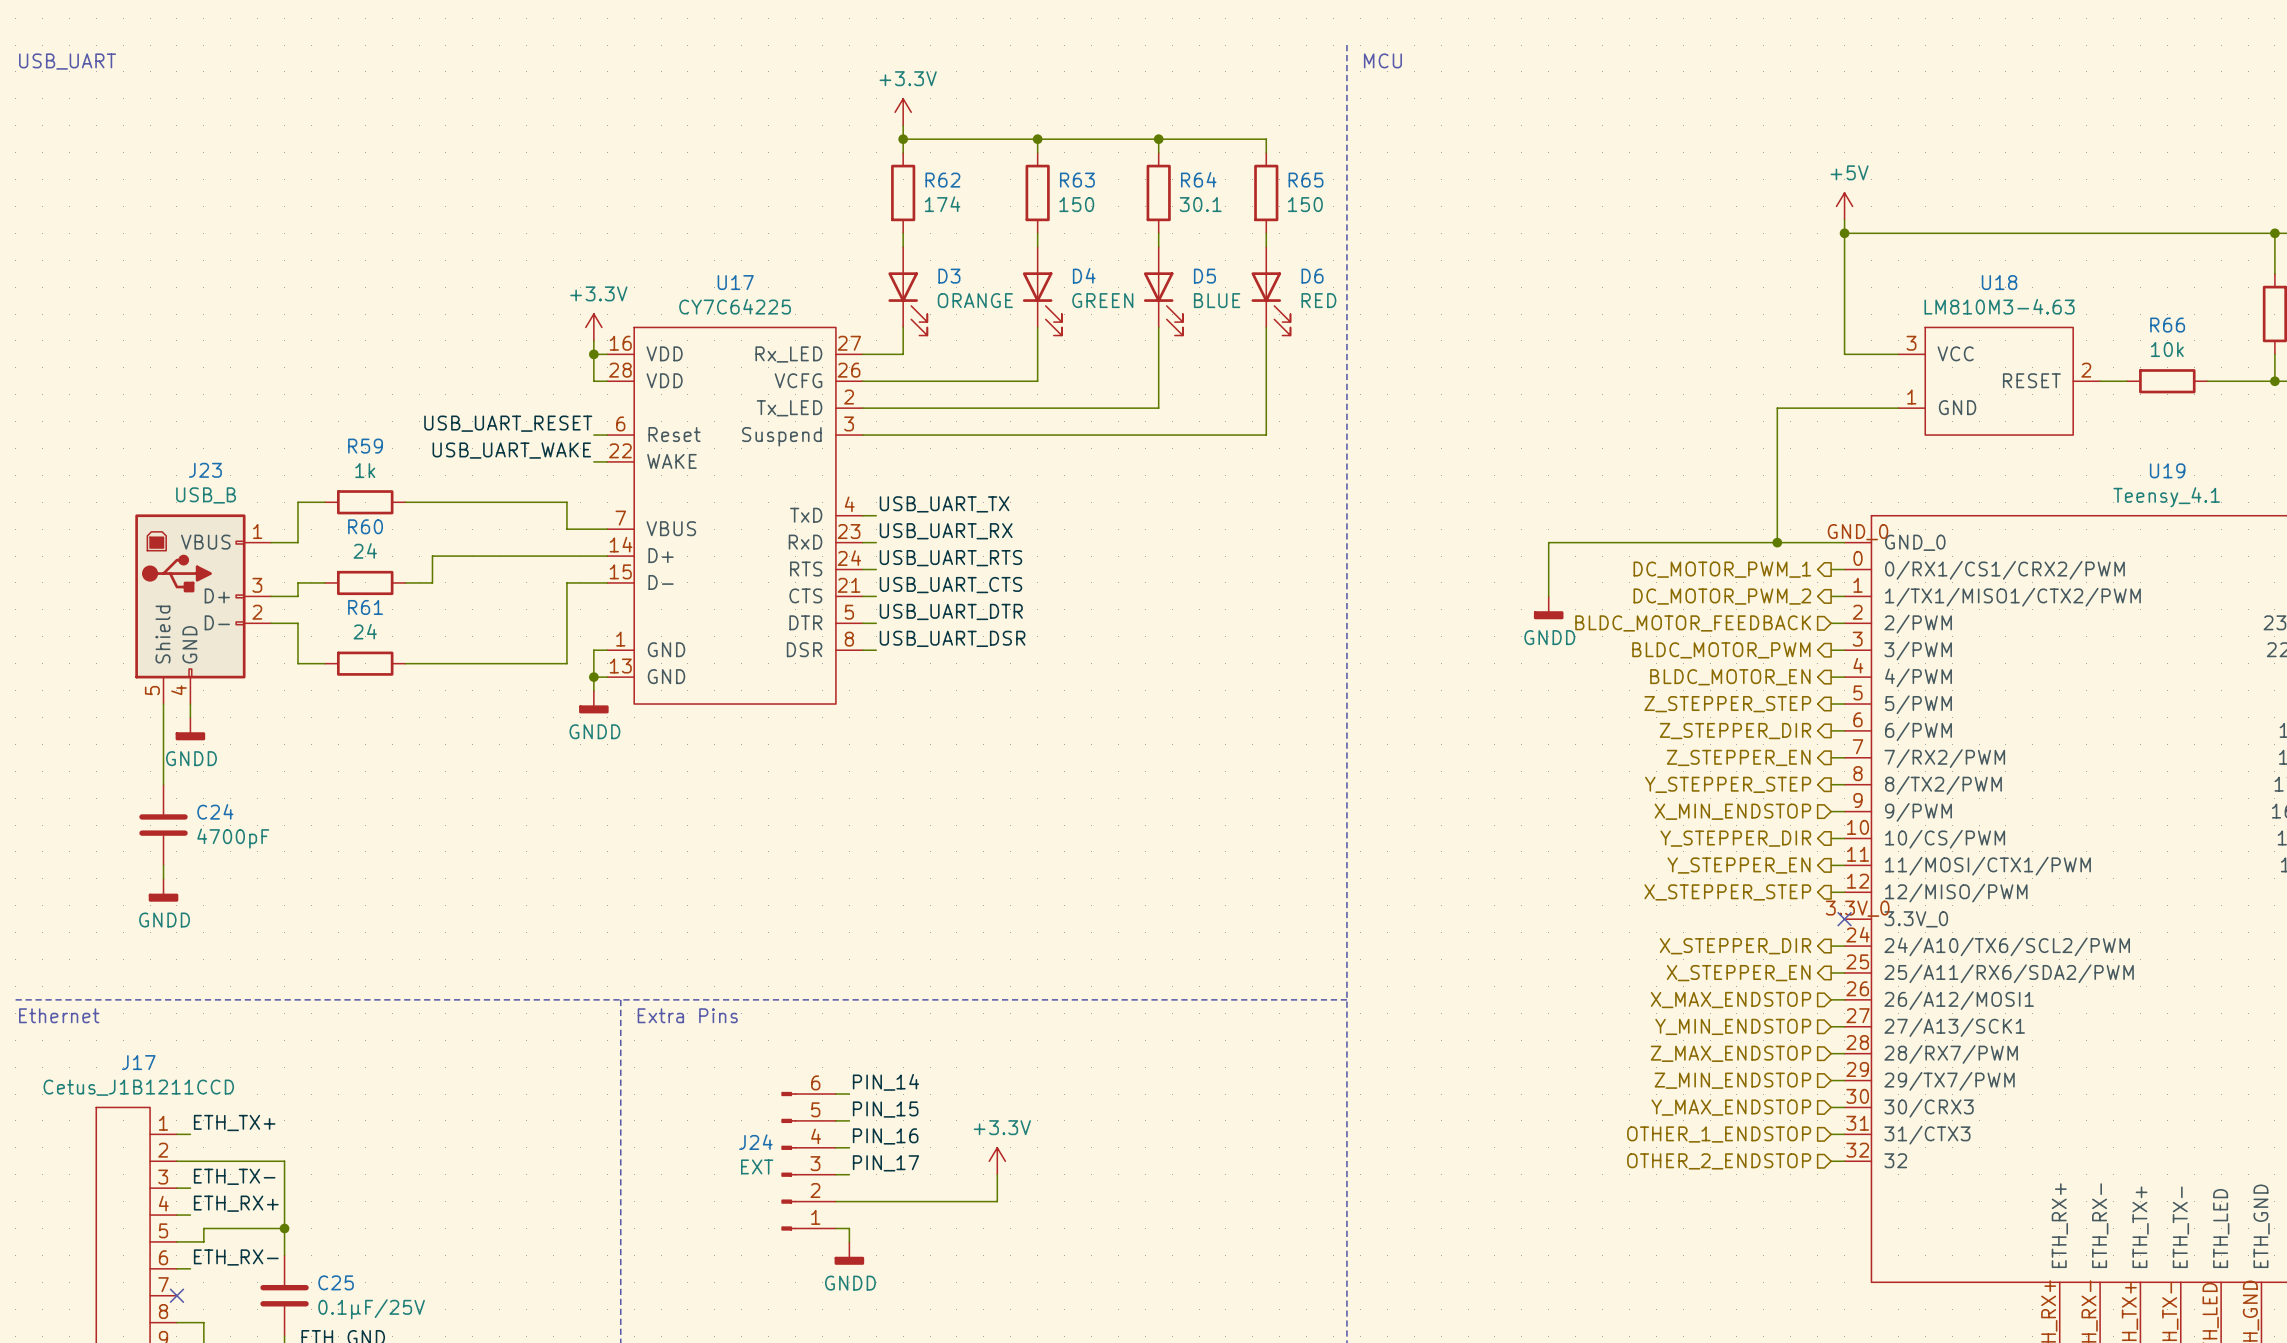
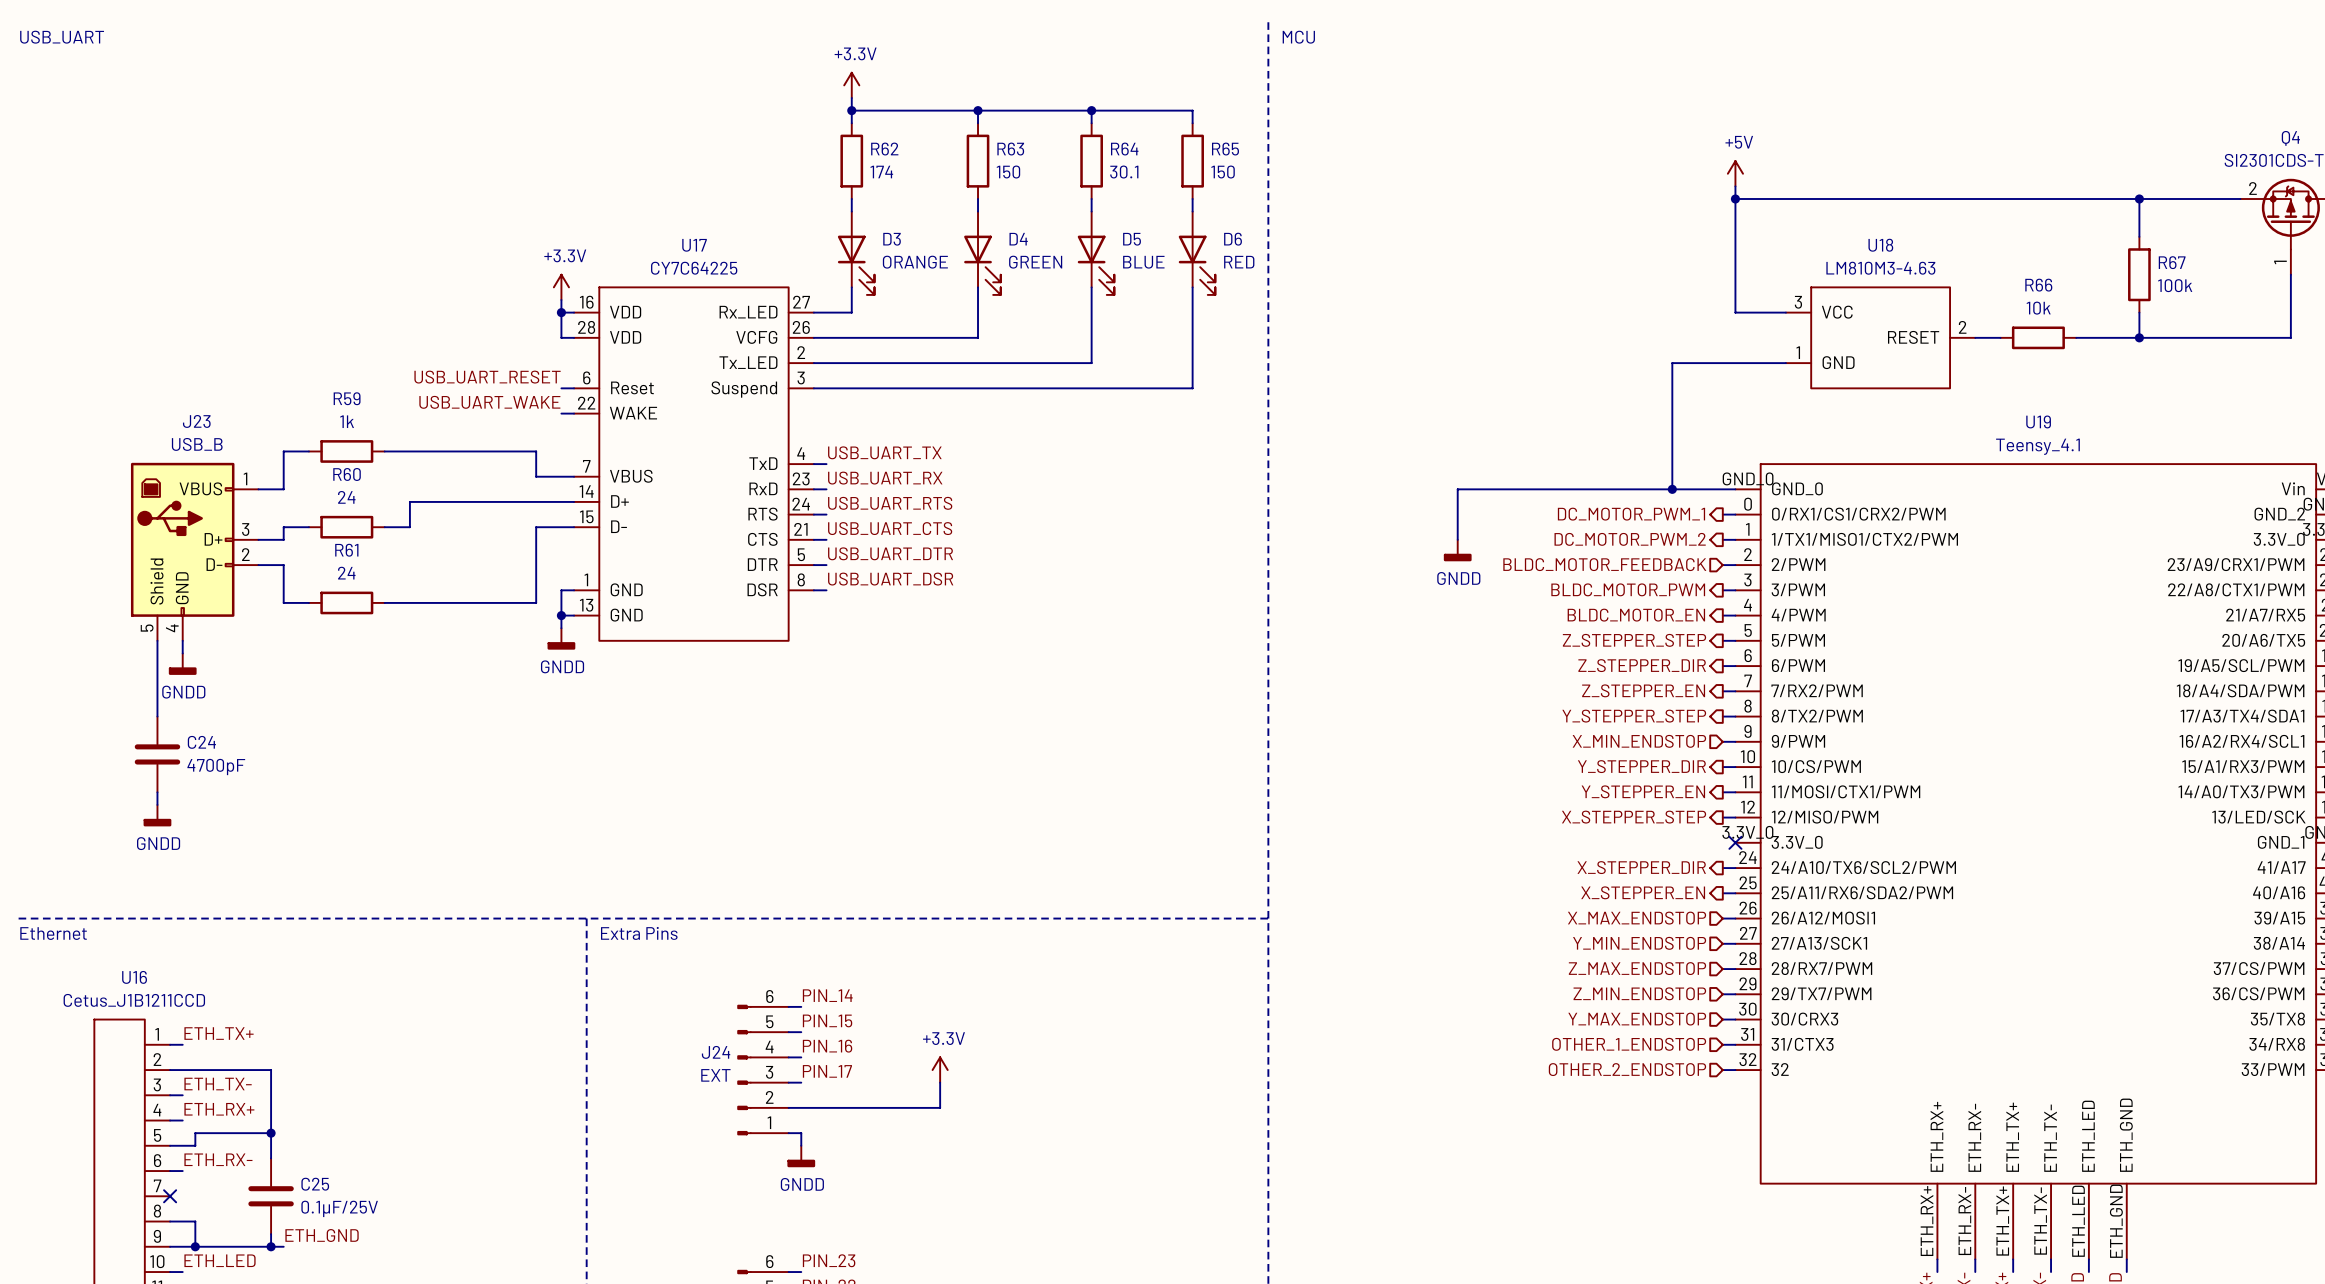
J17 name: J17 (138, 1062) -> U16 (134, 977)

